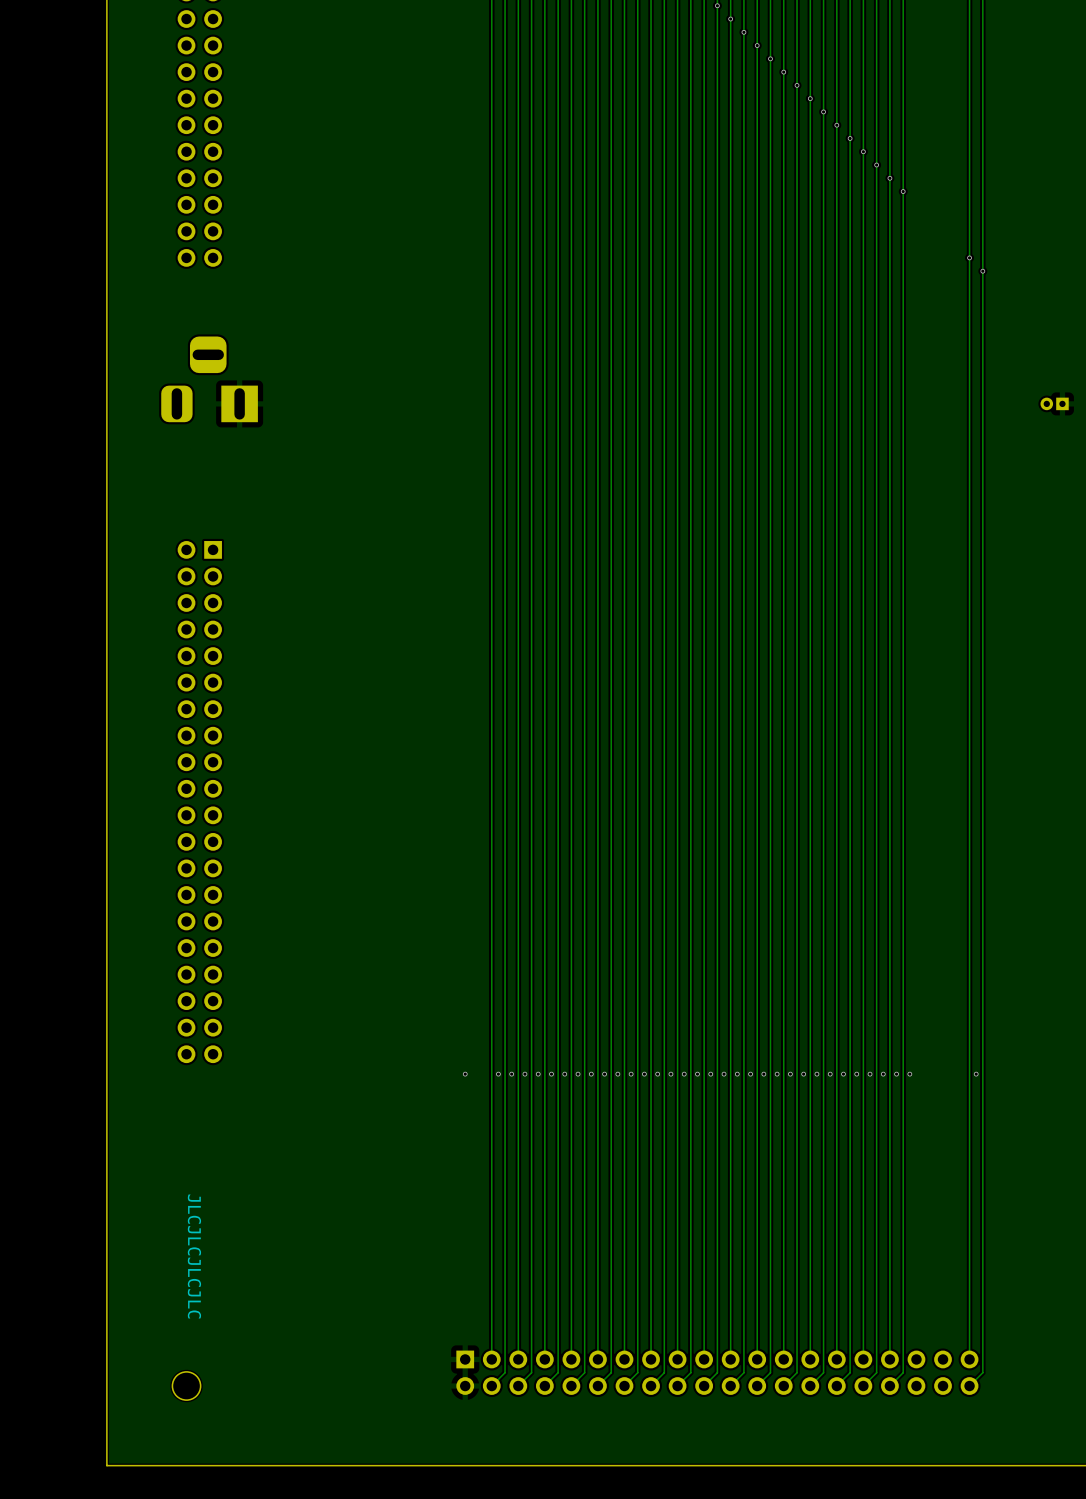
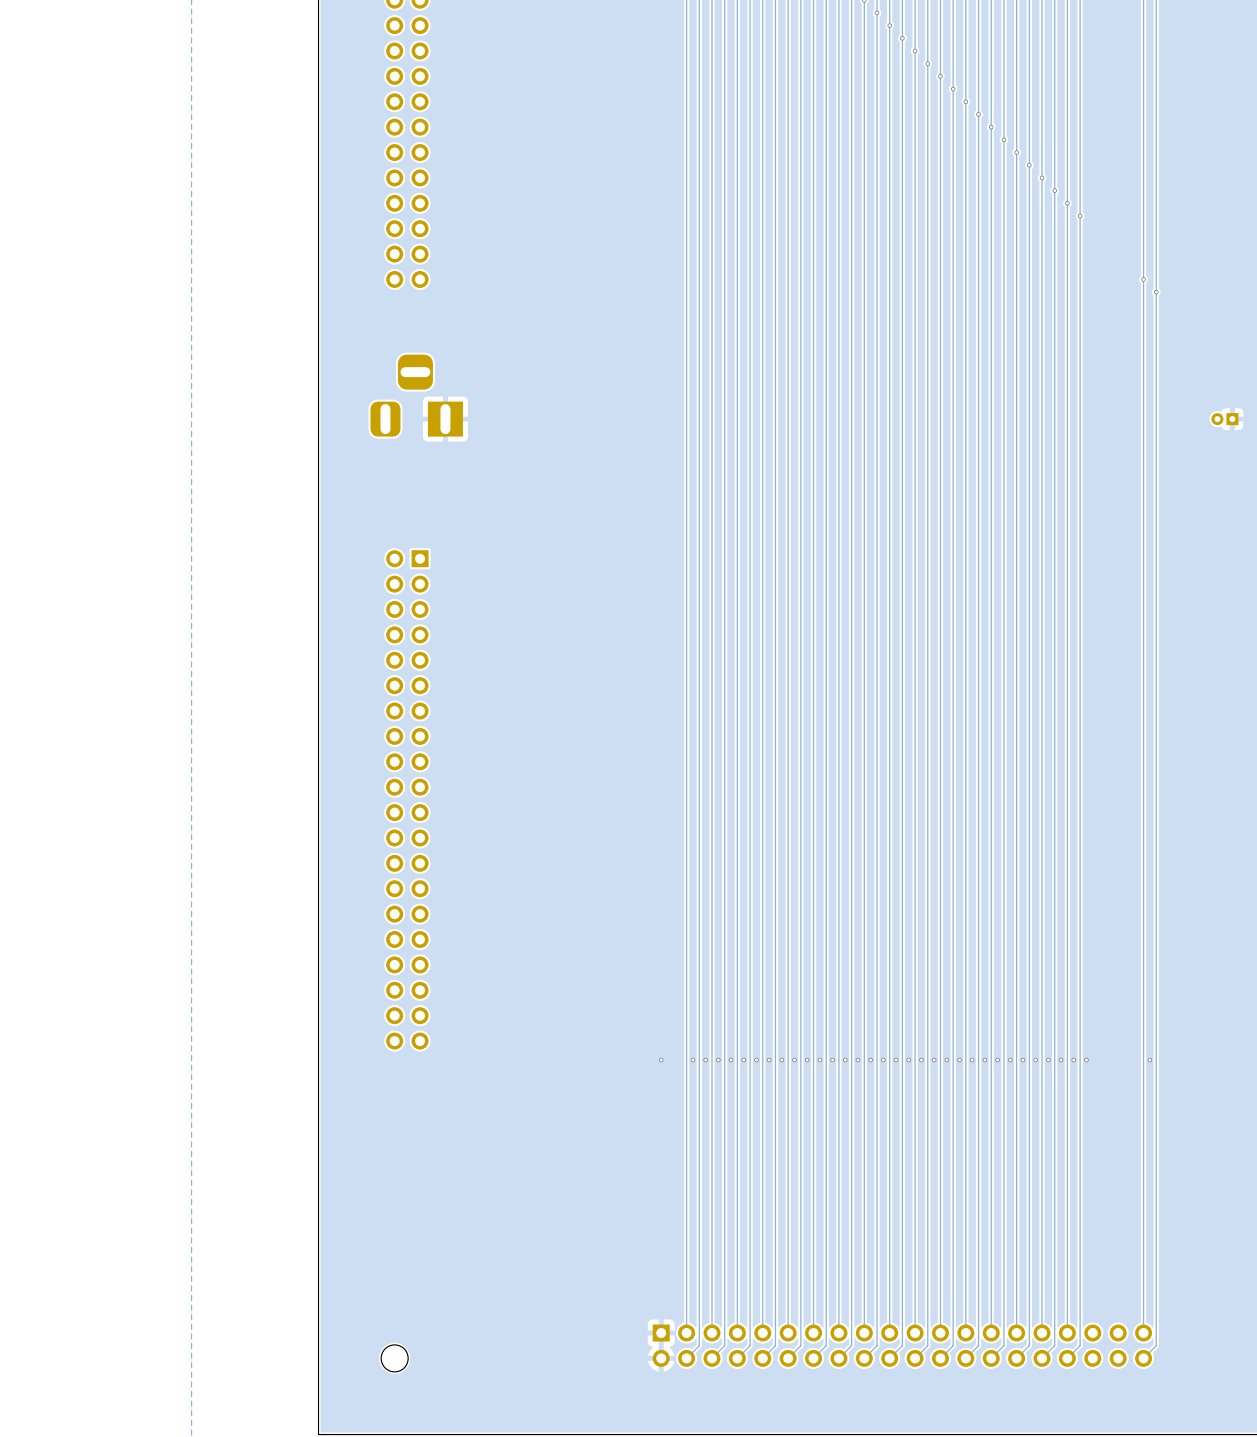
text: JLCJLCJLCJLC (194, 1256) -> none

